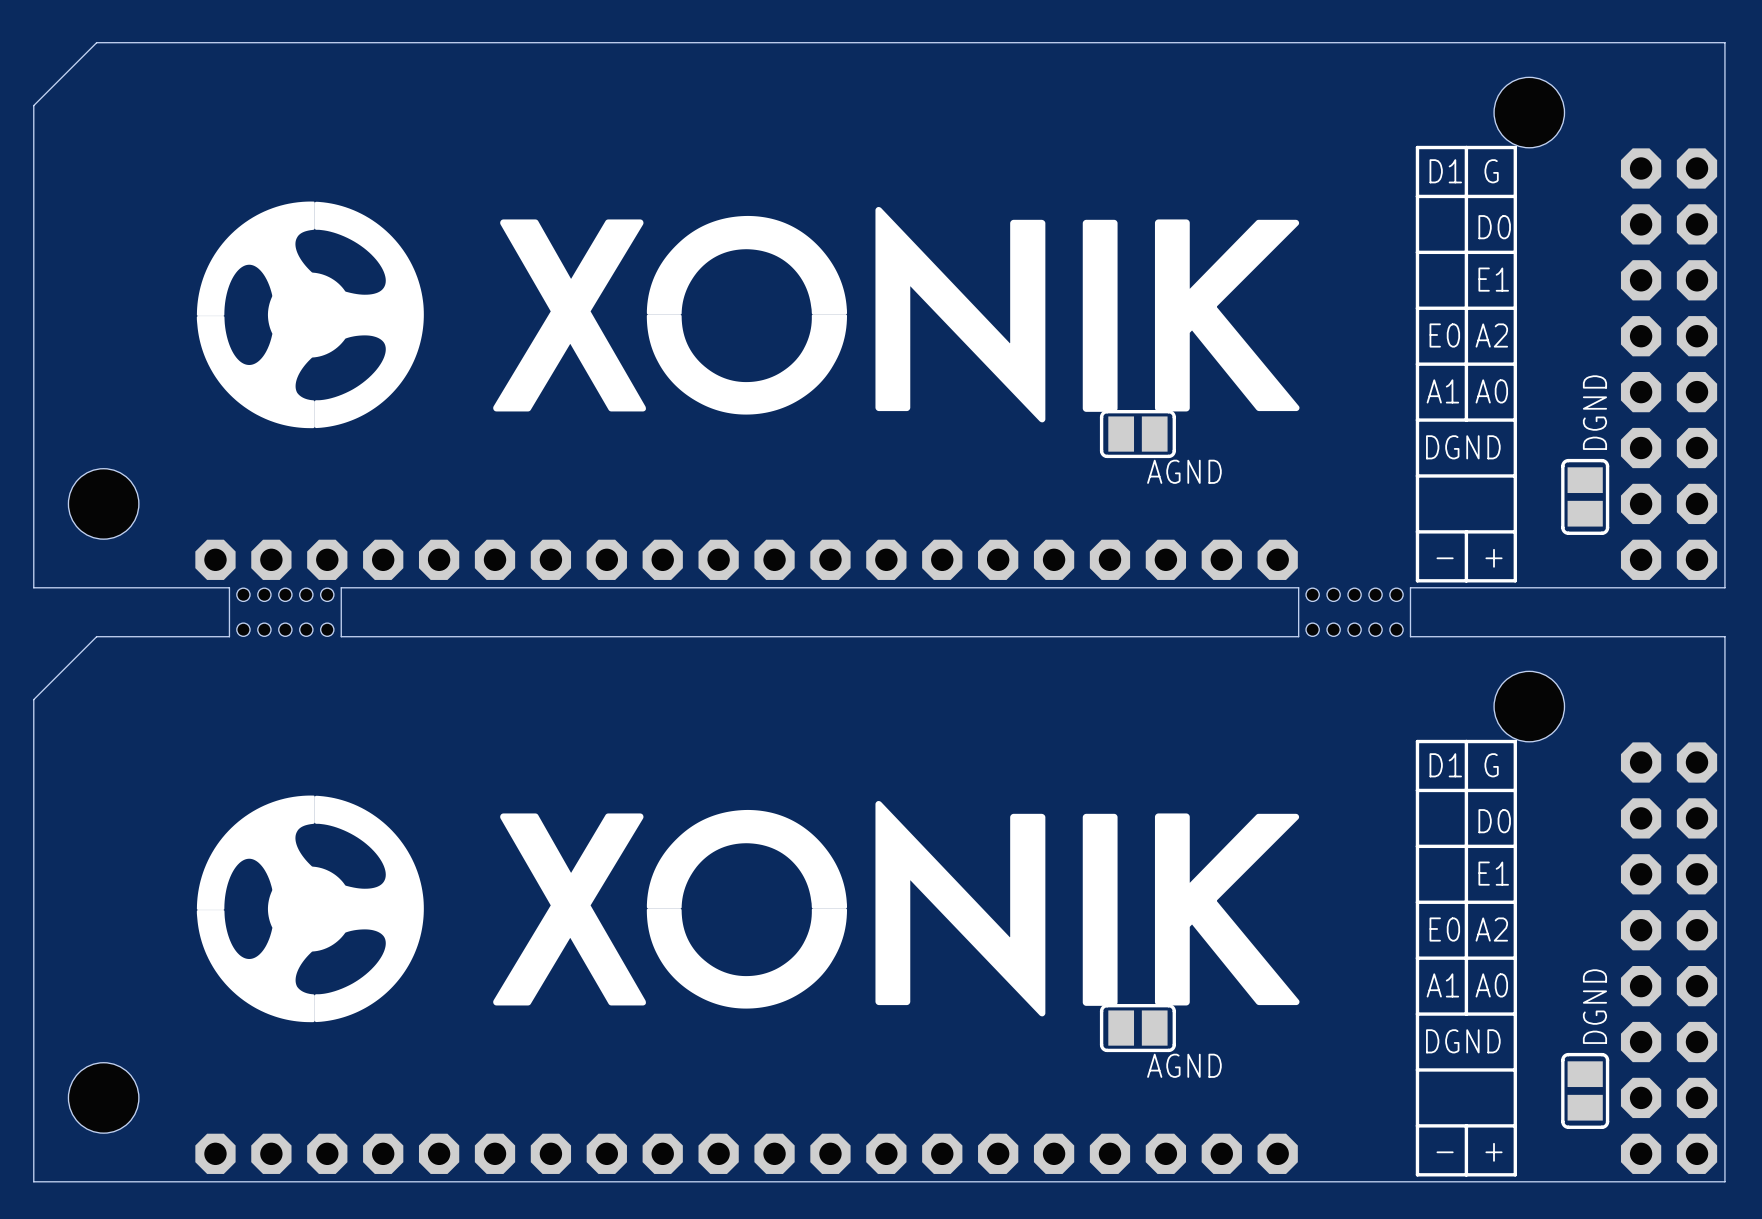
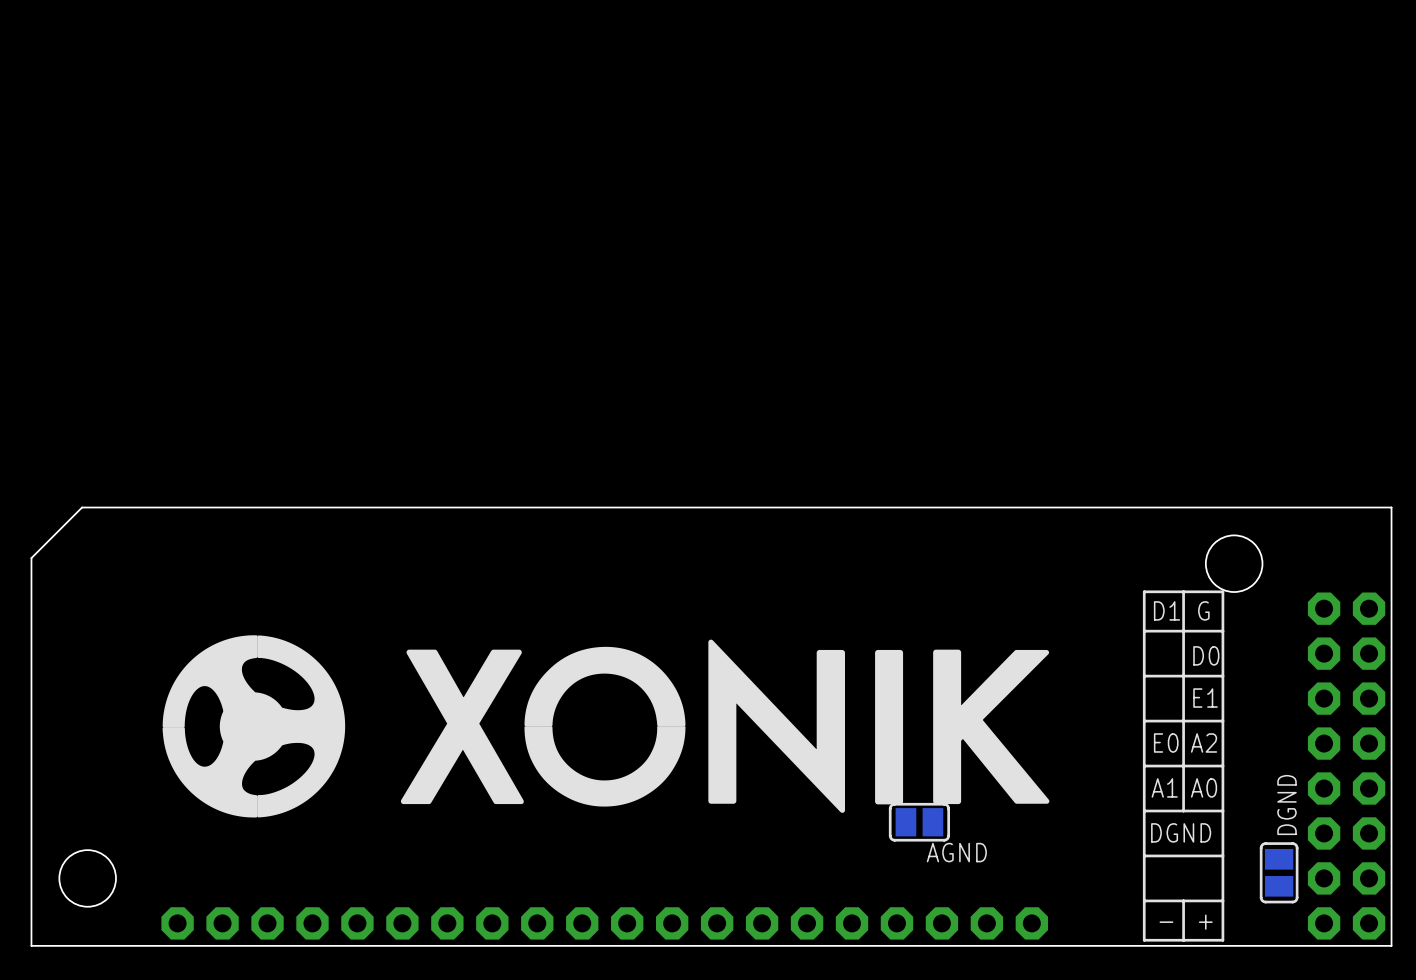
hole: (1529, 112) -> none
line: (1466, 147) (1466, 420) -> none
line: (1515, 147) (1515, 580) (1417, 580) (1417, 147) (1515, 147) -> none
text: D1 (1445, 171) -> none
text: G (1491, 171) -> none
line: (1515, 196) (1417, 196) -> none
drawing: [196, 201, 1300, 429] -> none
text: D0 (1494, 227) -> none
line: (1515, 252) (1417, 252) -> none
text: E1 (1493, 279) -> none
line: (1515, 308) (1417, 308) -> none
text: E0 (1444, 335) -> none
text: A2 (1491, 335) -> none
line: (1515, 364) (1417, 364) -> none
part: (1669, 364) -> none
text: A1 (1442, 391) -> none
text: A0 (1491, 391) -> none
text: DGND (1594, 412) -> none
line: (1515, 420) (1417, 420) -> none
part: (1137, 434) -> none
text: DGND (1463, 447) -> none
text: AGND (1184, 471) -> none
line: (1515, 475) (1417, 475) -> none
part: (1585, 496) -> none
hole: (103, 503) -> none
line: (1466, 531) (1466, 580) -> none
line: (1515, 531) (1417, 531) -> none
text: - (1445, 558) -> none
text: + (1494, 558) -> none
part: (746, 559) -> none
hole: (243, 594) -> none
hole: (264, 594) -> none
hole: (285, 594) -> none
hole: (306, 594) -> none
hole: (327, 594) -> none
hole: (1312, 594) -> none
hole: (1333, 594) -> none
hole: (1354, 594) -> none
hole: (1375, 594) -> none
hole: (1396, 594) -> none
hole: (243, 629) -> none
hole: (264, 629) -> none
hole: (285, 629) -> none
hole: (306, 629) -> none
hole: (327, 629) -> none
hole: (1312, 629) -> none
hole: (1333, 629) -> none
hole: (1354, 629) -> none
hole: (1375, 629) -> none
hole: (1396, 629) -> none
board edge: (1298, 636) (1298, 587) (341, 587) (341, 636) -> (188, 507) (278, 507)
board edge: (1410, 636) (1410, 587) (1724, 587) (1724, 42) (96, 42) (33, 105) (33, 587) (229, 587) (229, 636) -> (1138, 507) (1048, 507)

